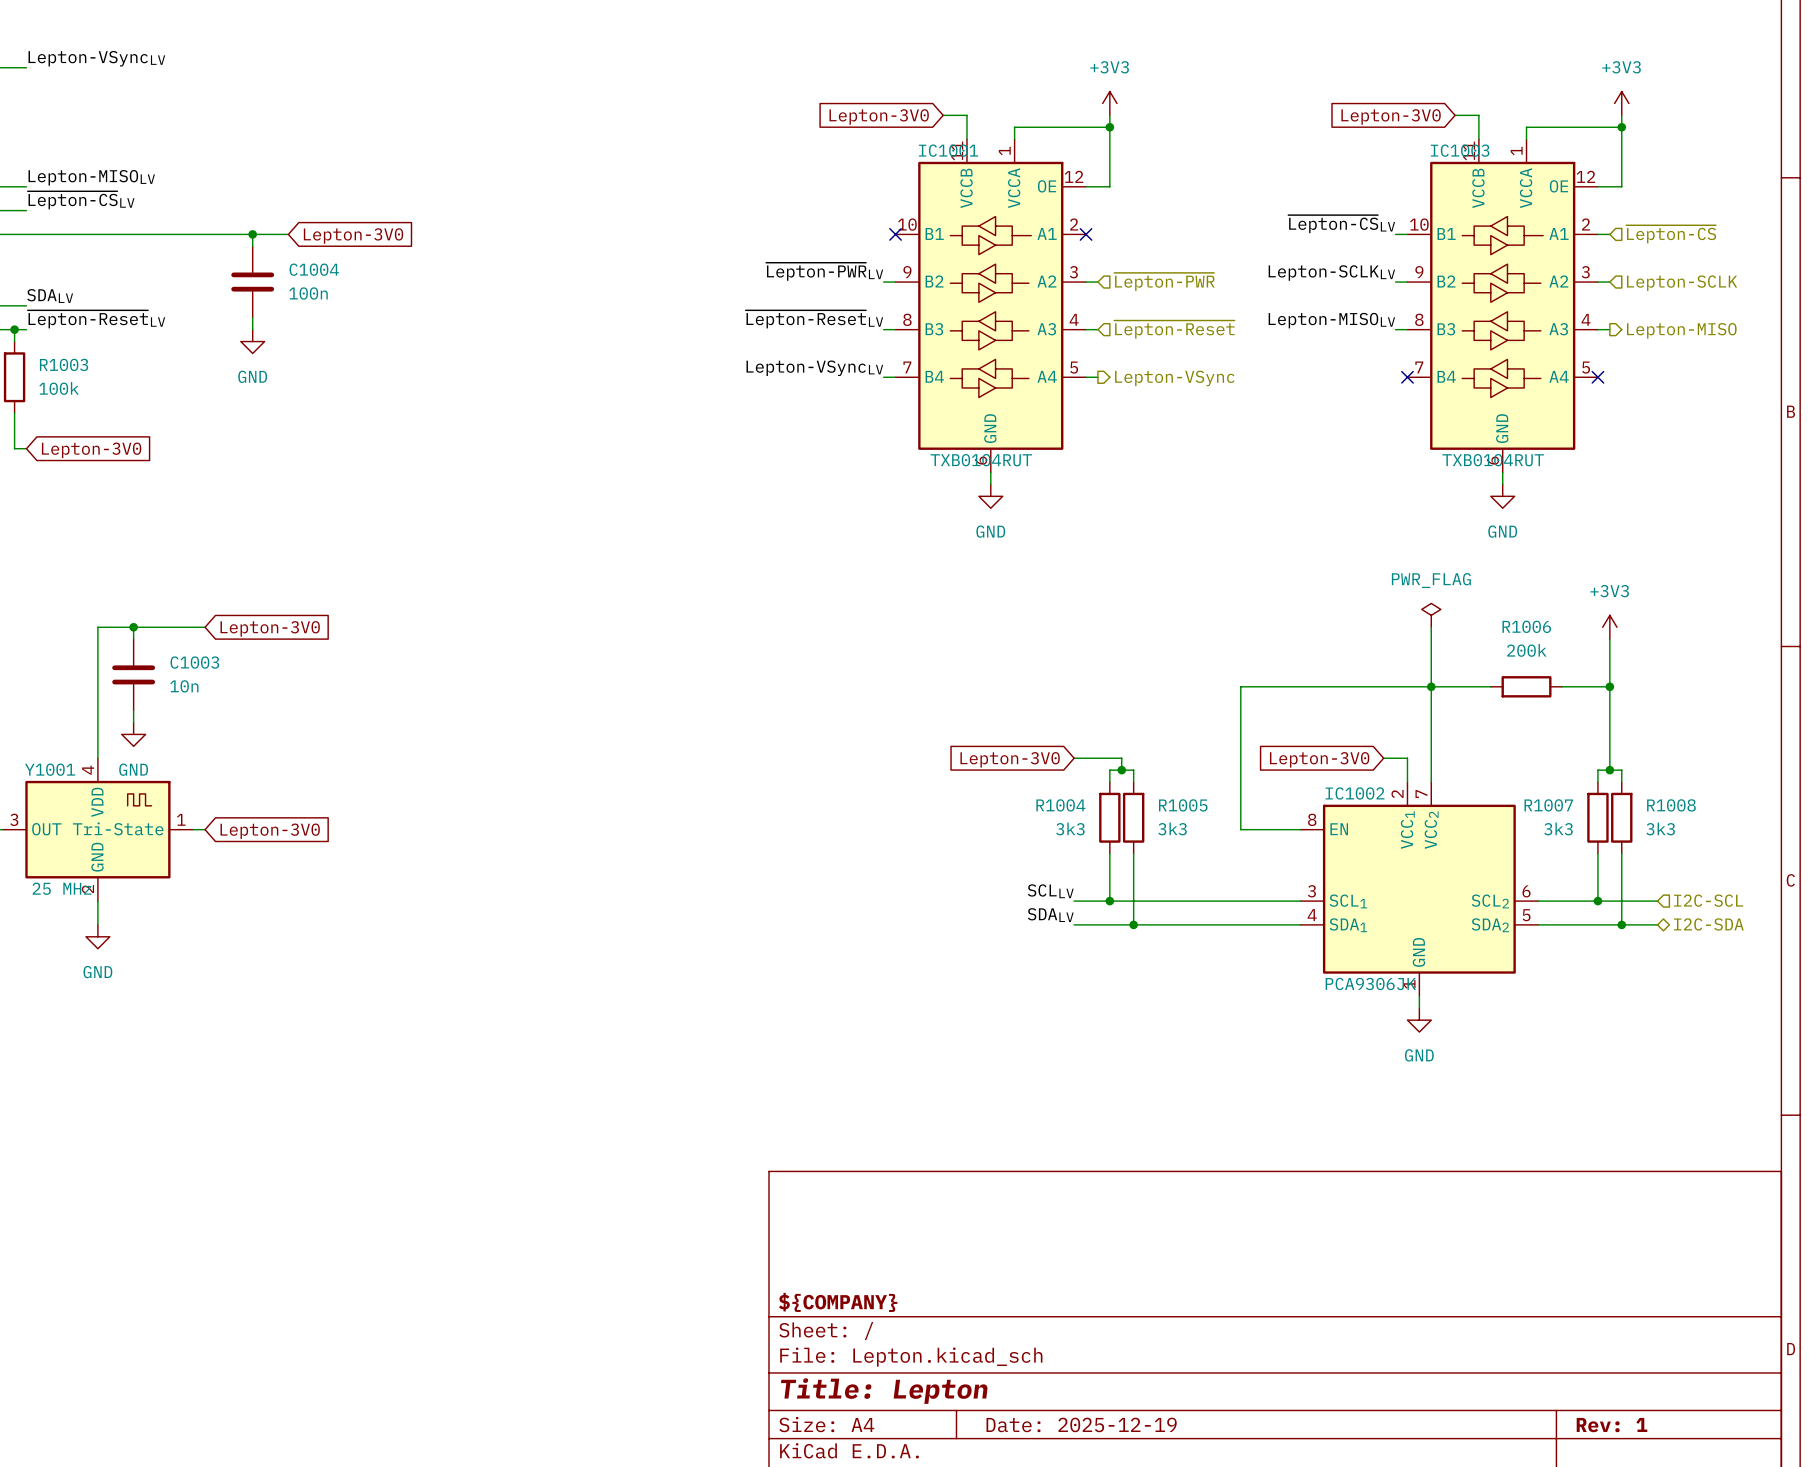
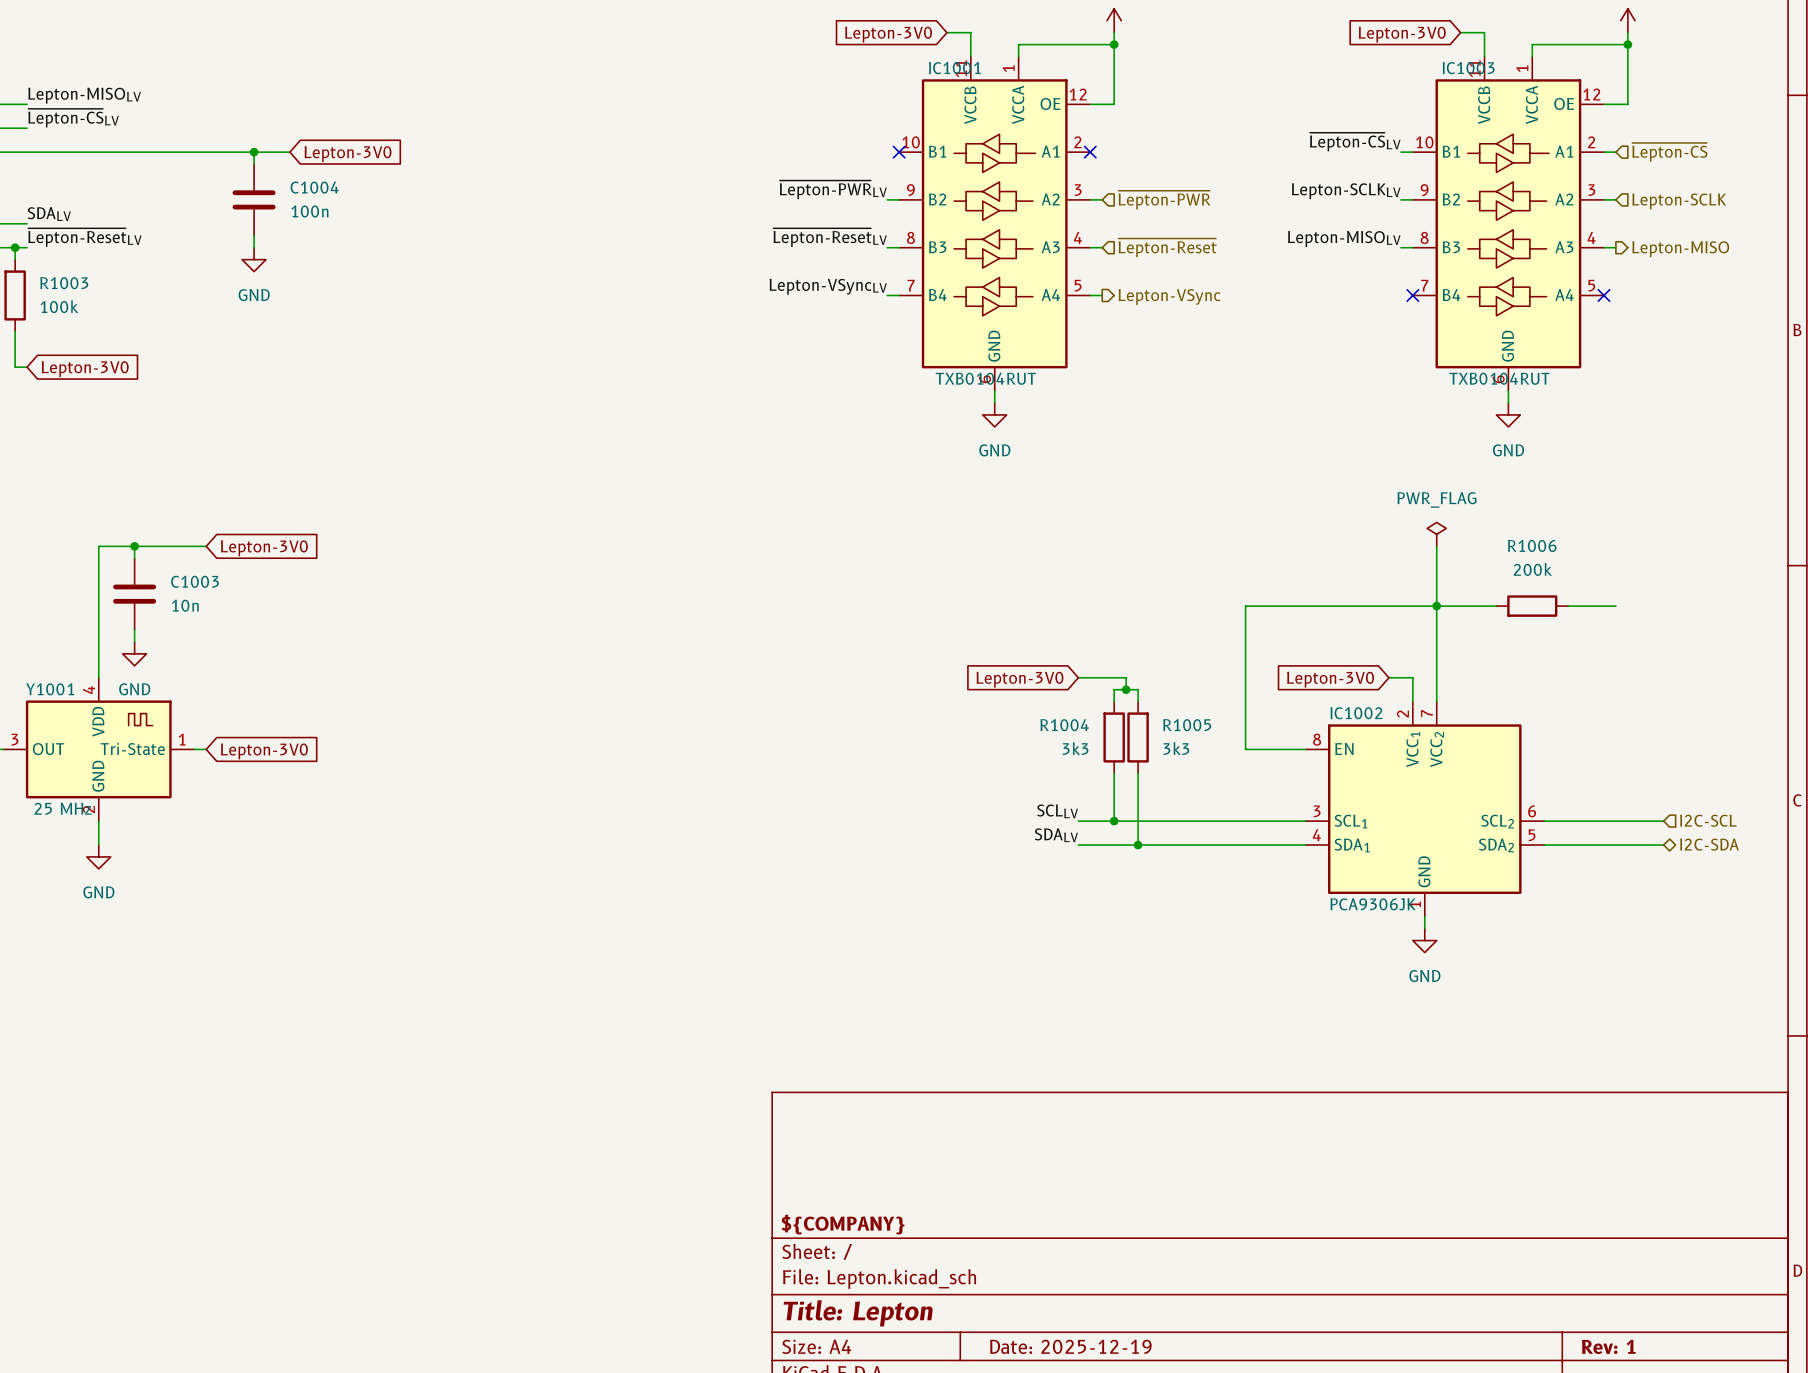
power symbol: +3V3 (1609, 627) -> none
wire: (1609, 639) (1609, 770) -> none
junction: (1609, 686) -> none
junction: (1609, 770) -> none
wire: (1597, 782) (1597, 770) (1621, 770) (1621, 782) -> none
R1007: 3k3 (1597, 817) -> none
R1008: 3k3 (1621, 817) -> none
wire: (1597, 853) (1597, 901) -> none
wire: (1621, 853) (1621, 924) -> none
junction: (1597, 901) -> none
junction: (1621, 924) -> none

